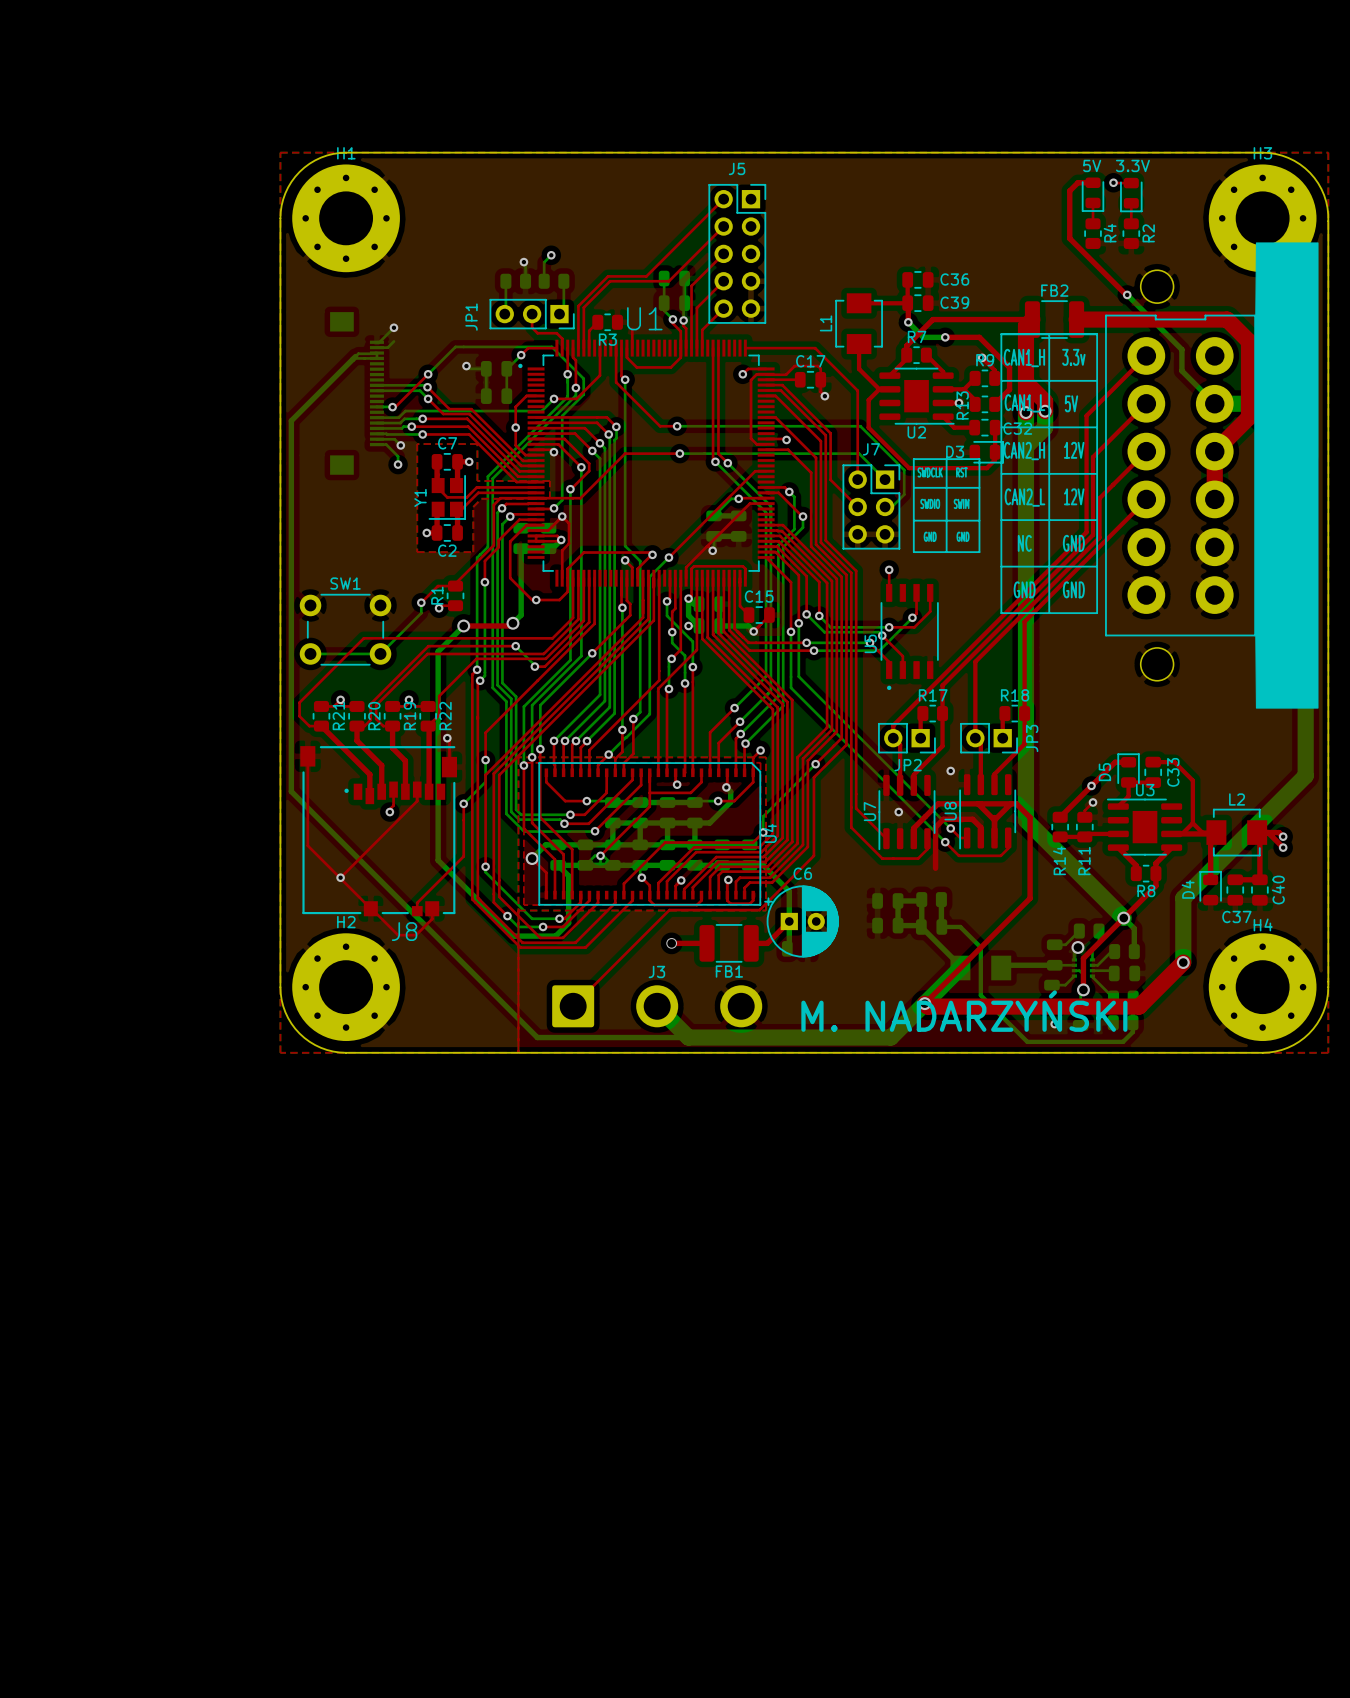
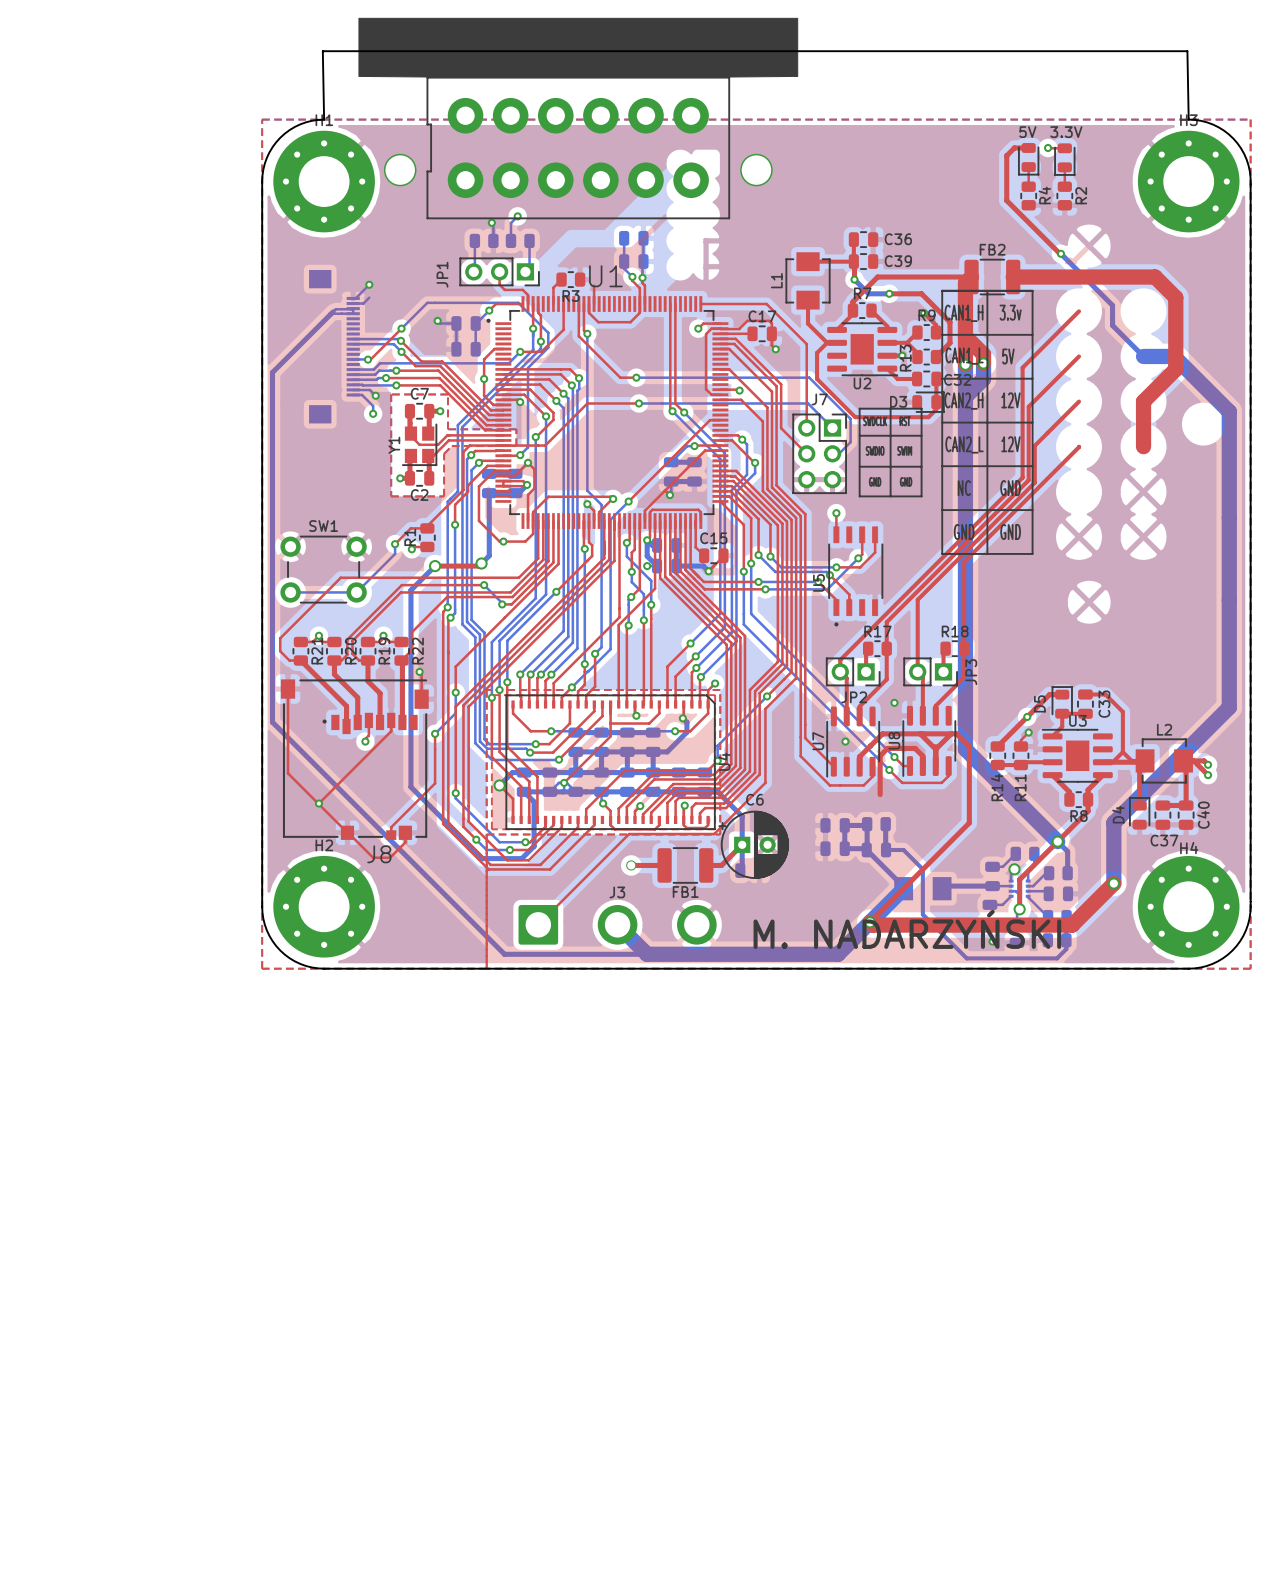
part: none -> (578, 118)
board edge: (346, 152) (1262, 152) -> (324, 119) (322, 51) (1187, 51) (1188, 119)
top track: (723, 199) (646, 276) (608, 276) (578, 306) (578, 348) -> none
top track: (723, 226) (668, 281) (610, 281) (583, 307) (583, 348) -> none
top track: (723, 253) (691, 286) (691, 348) -> none
J5: (737, 253) -> none
top track: (723, 281) (696, 307) (696, 348) -> none
top track: (723, 308) (702, 329) (702, 348) -> none
part: (1211, 475) -> none

